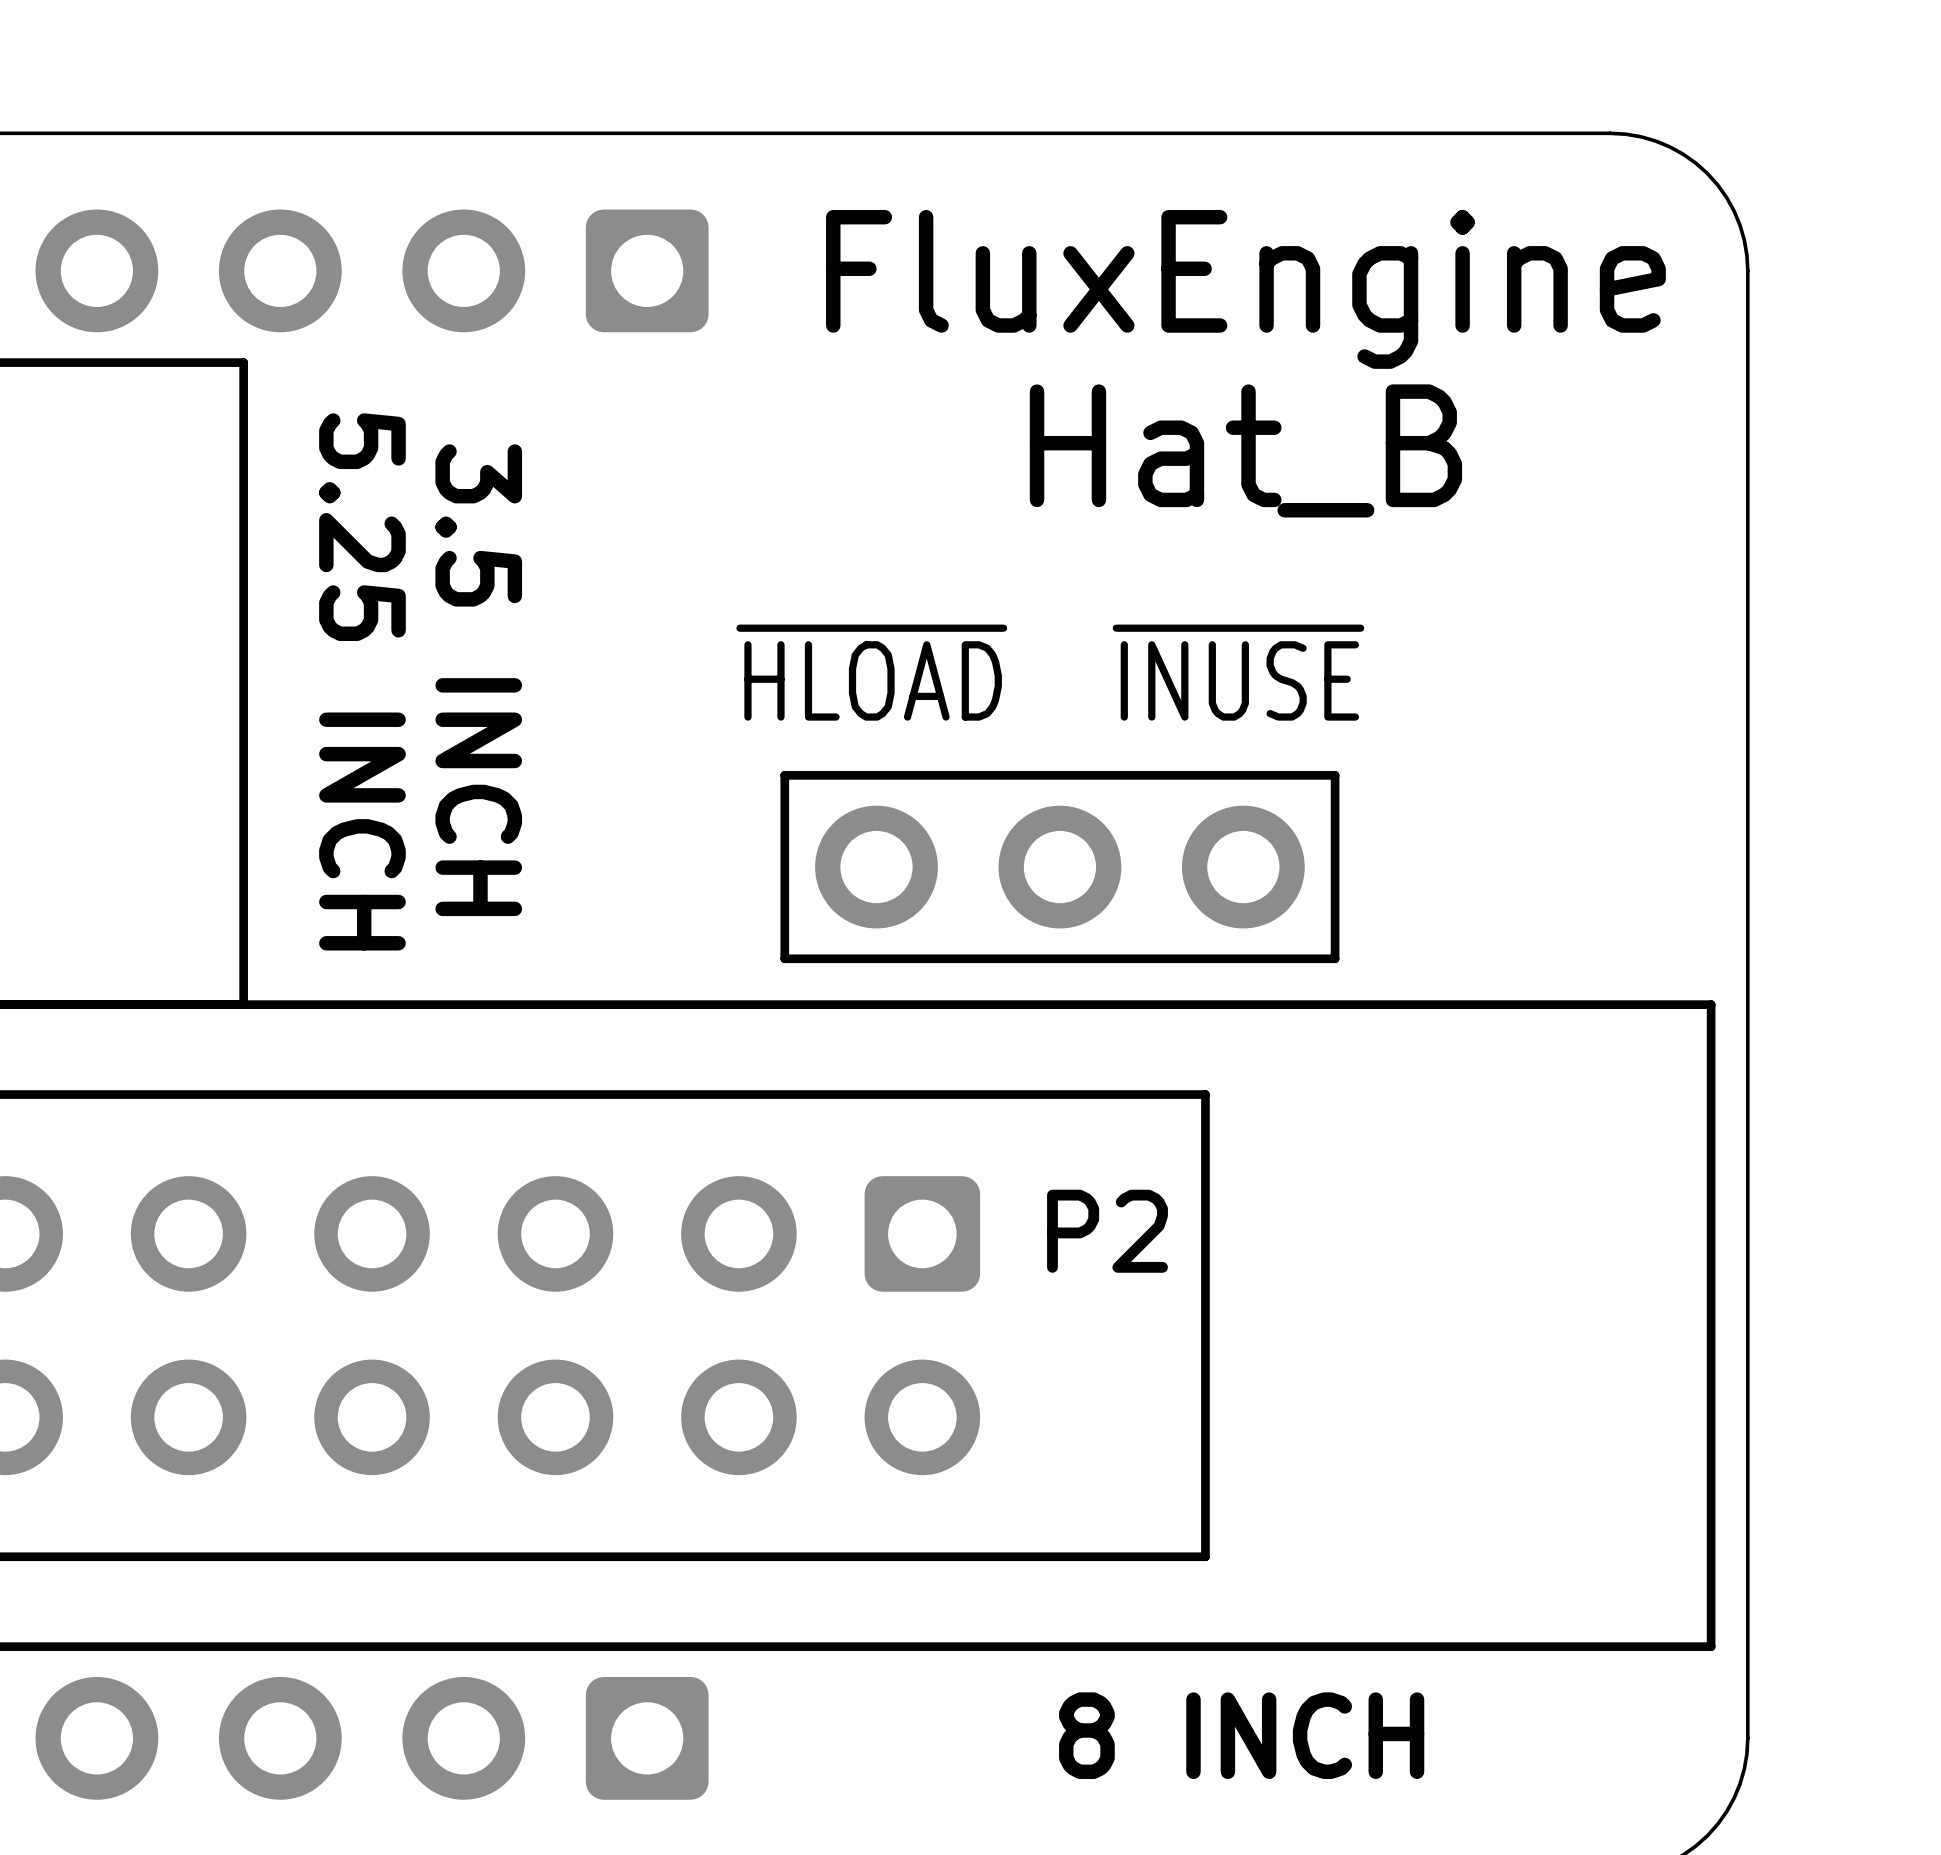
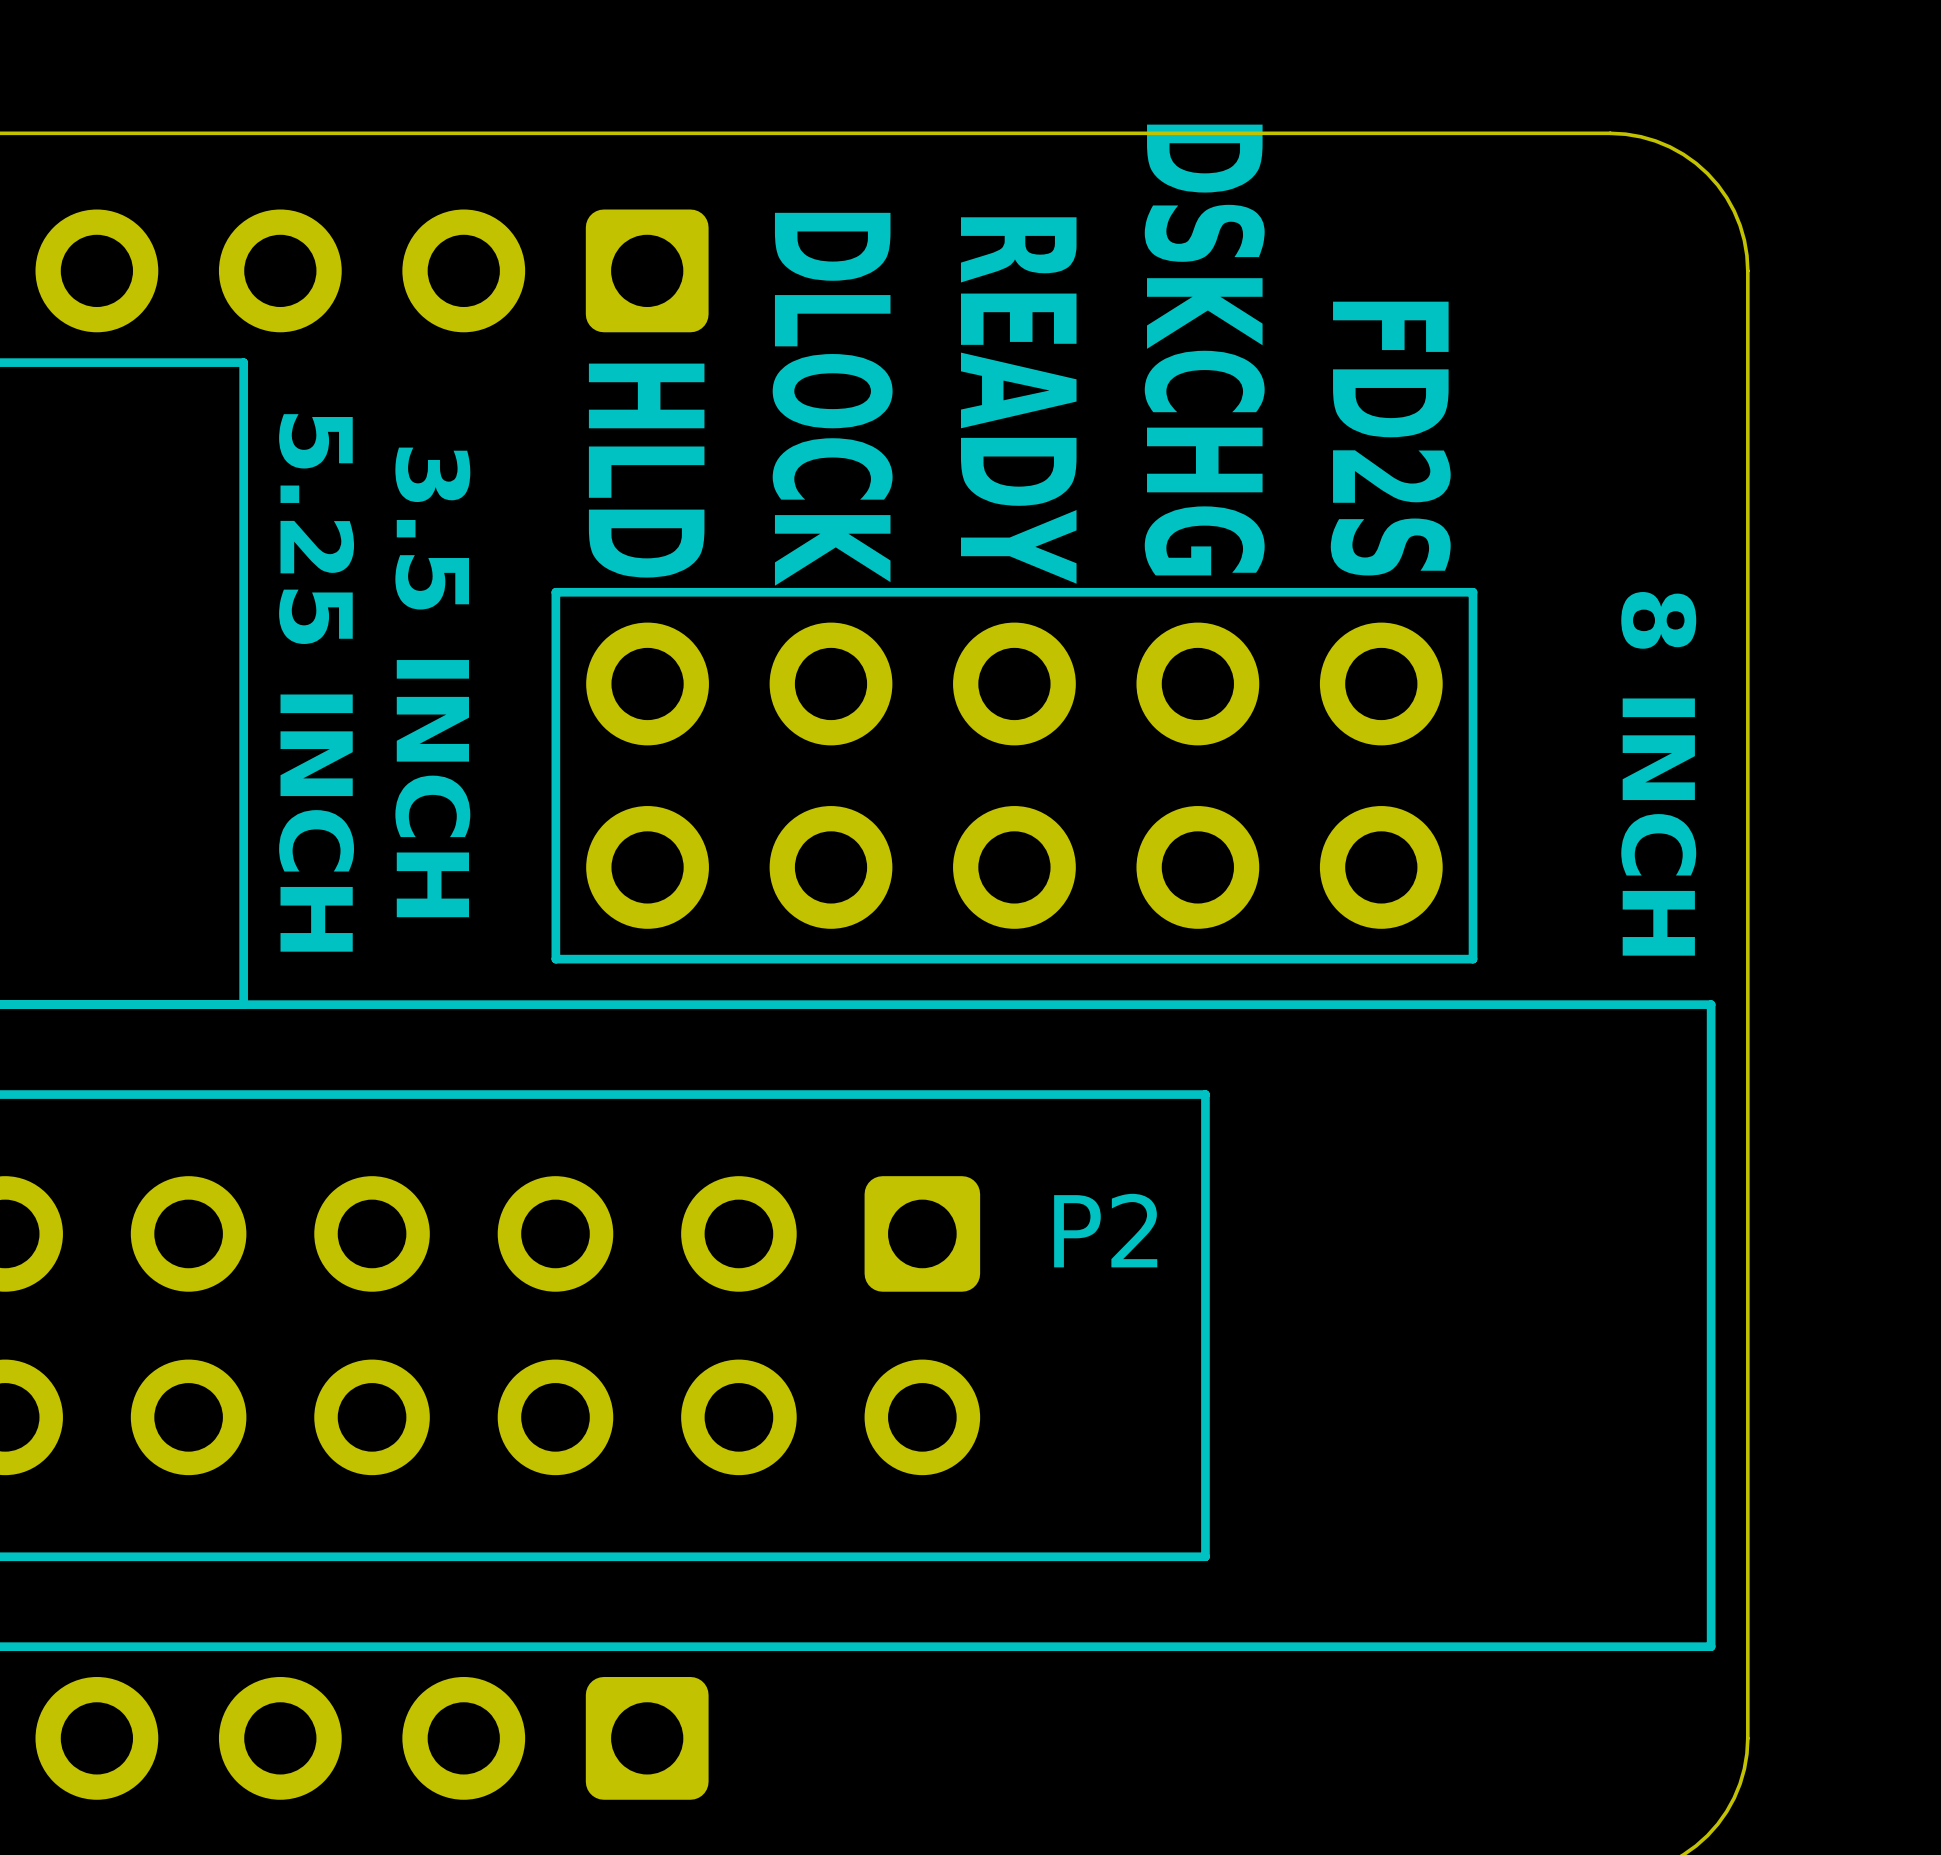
text: FluxEngine (1245, 289) -> none
text: none -> DSKCHG (1204, 350)
text: none -> DLOCK (832, 399)
text: none -> READY (1018, 400)
text: none -> FD2S (1390, 438)
text: Hat_B (1245, 450) -> none
text: none -> HLD (646, 470)
text: ~{HLOAD} (871, 672) -> none
text: ~{INUSE} (1238, 672) -> none
text position: 3.5 INCH (478, 680) -> 3.5 INCH (432, 682)
text position: 5.25 INCH (362, 681) -> 5.25 INCH (316, 682)
part: none -> (1014, 775)
part: (1059, 867) -> none
text rotation: 0° (1241, 1735) -> 90° clockwise (1658, 773)
text position: 8 INCH (1241, 1735) -> 8 INCH (1658, 773)

